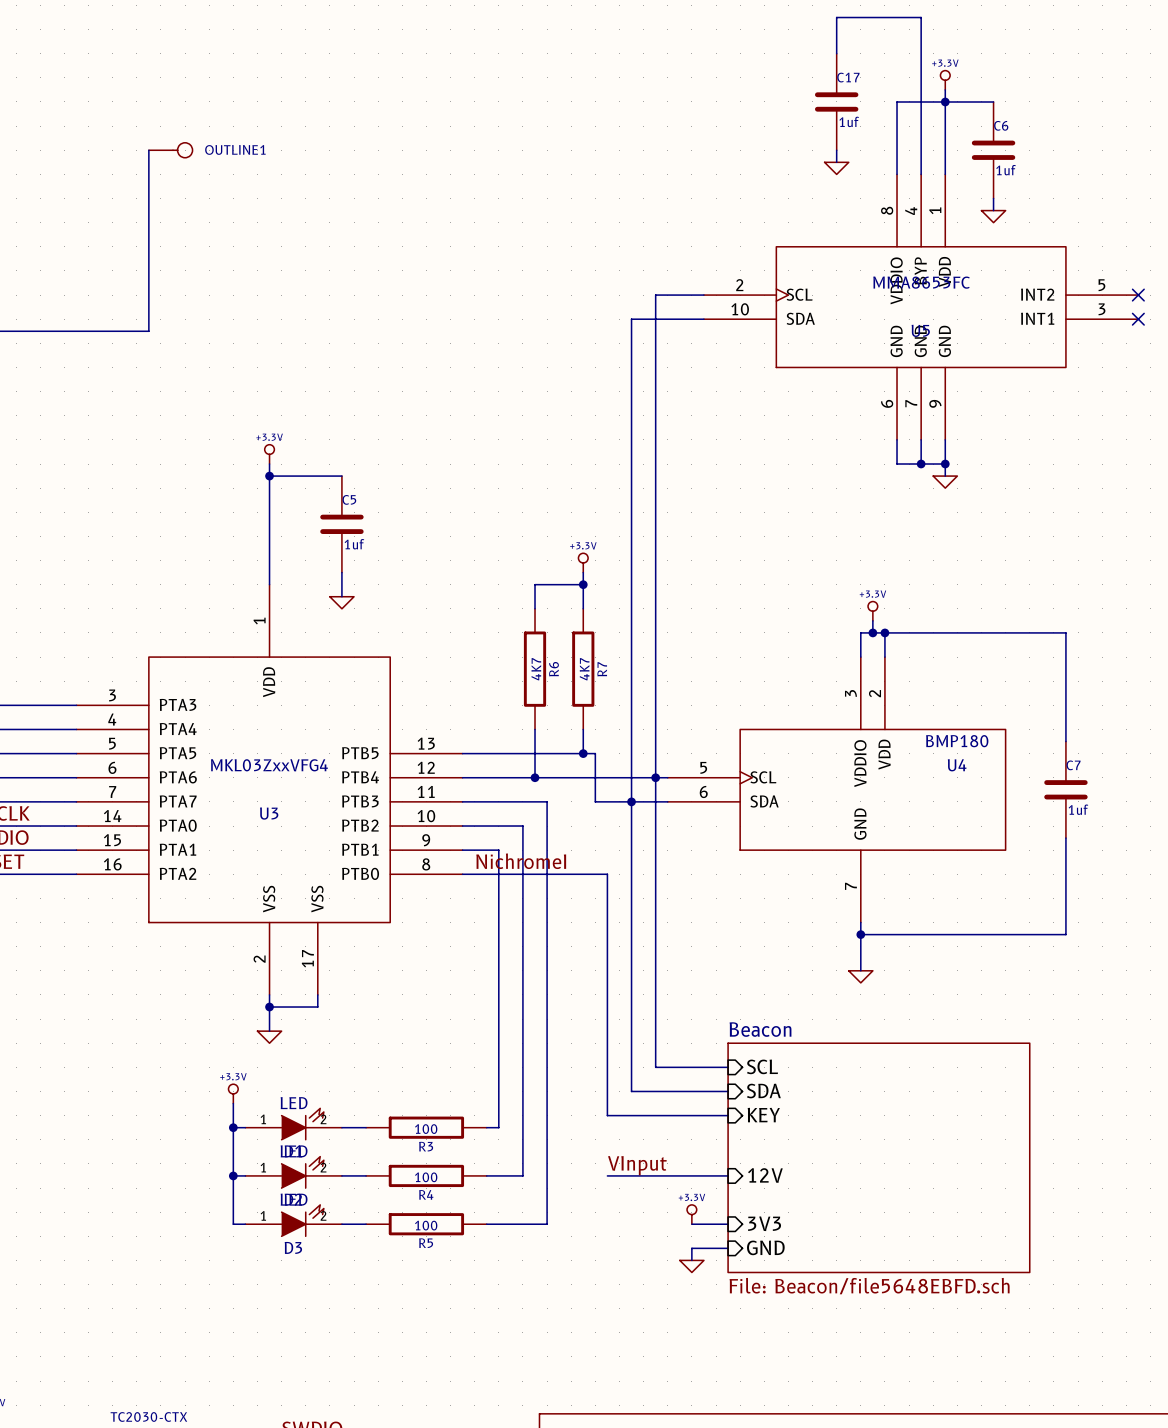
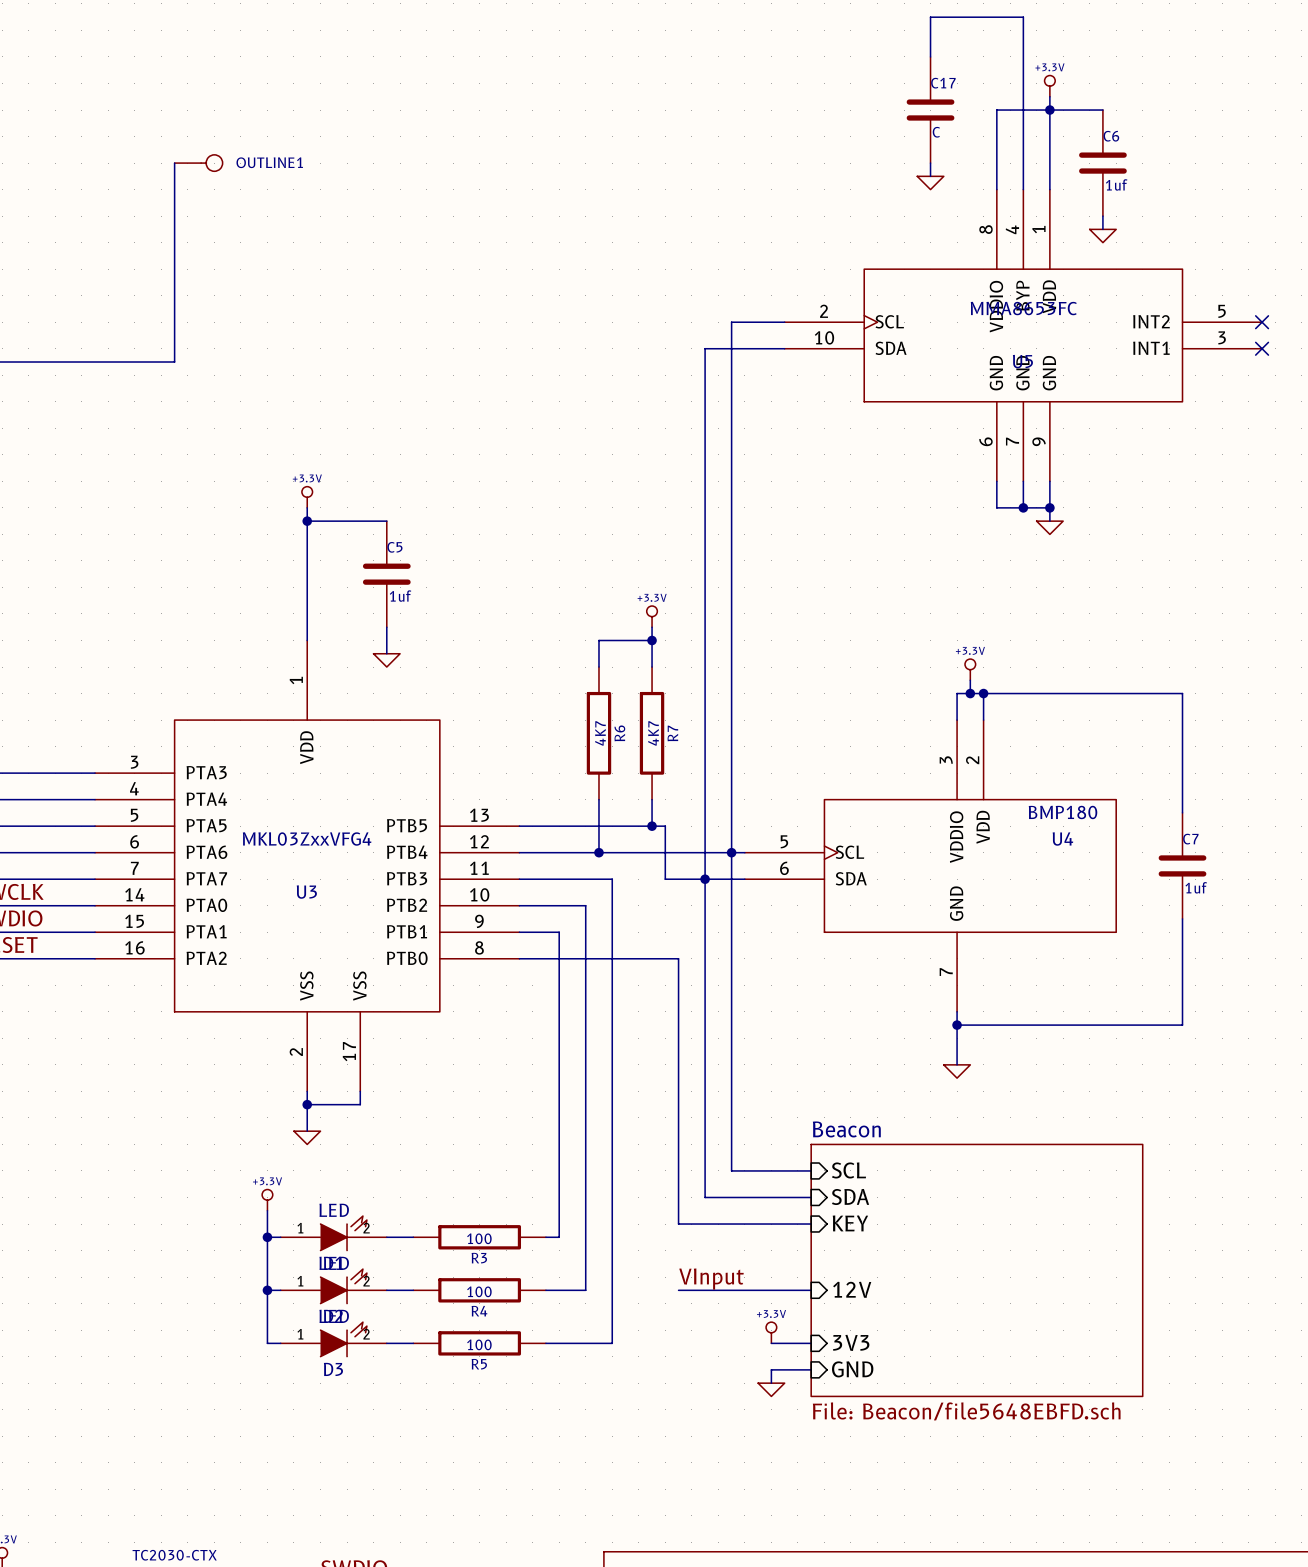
C17 value: 1uf (849, 121) -> C (936, 132)
label: NichromeI (521, 861) -> none

